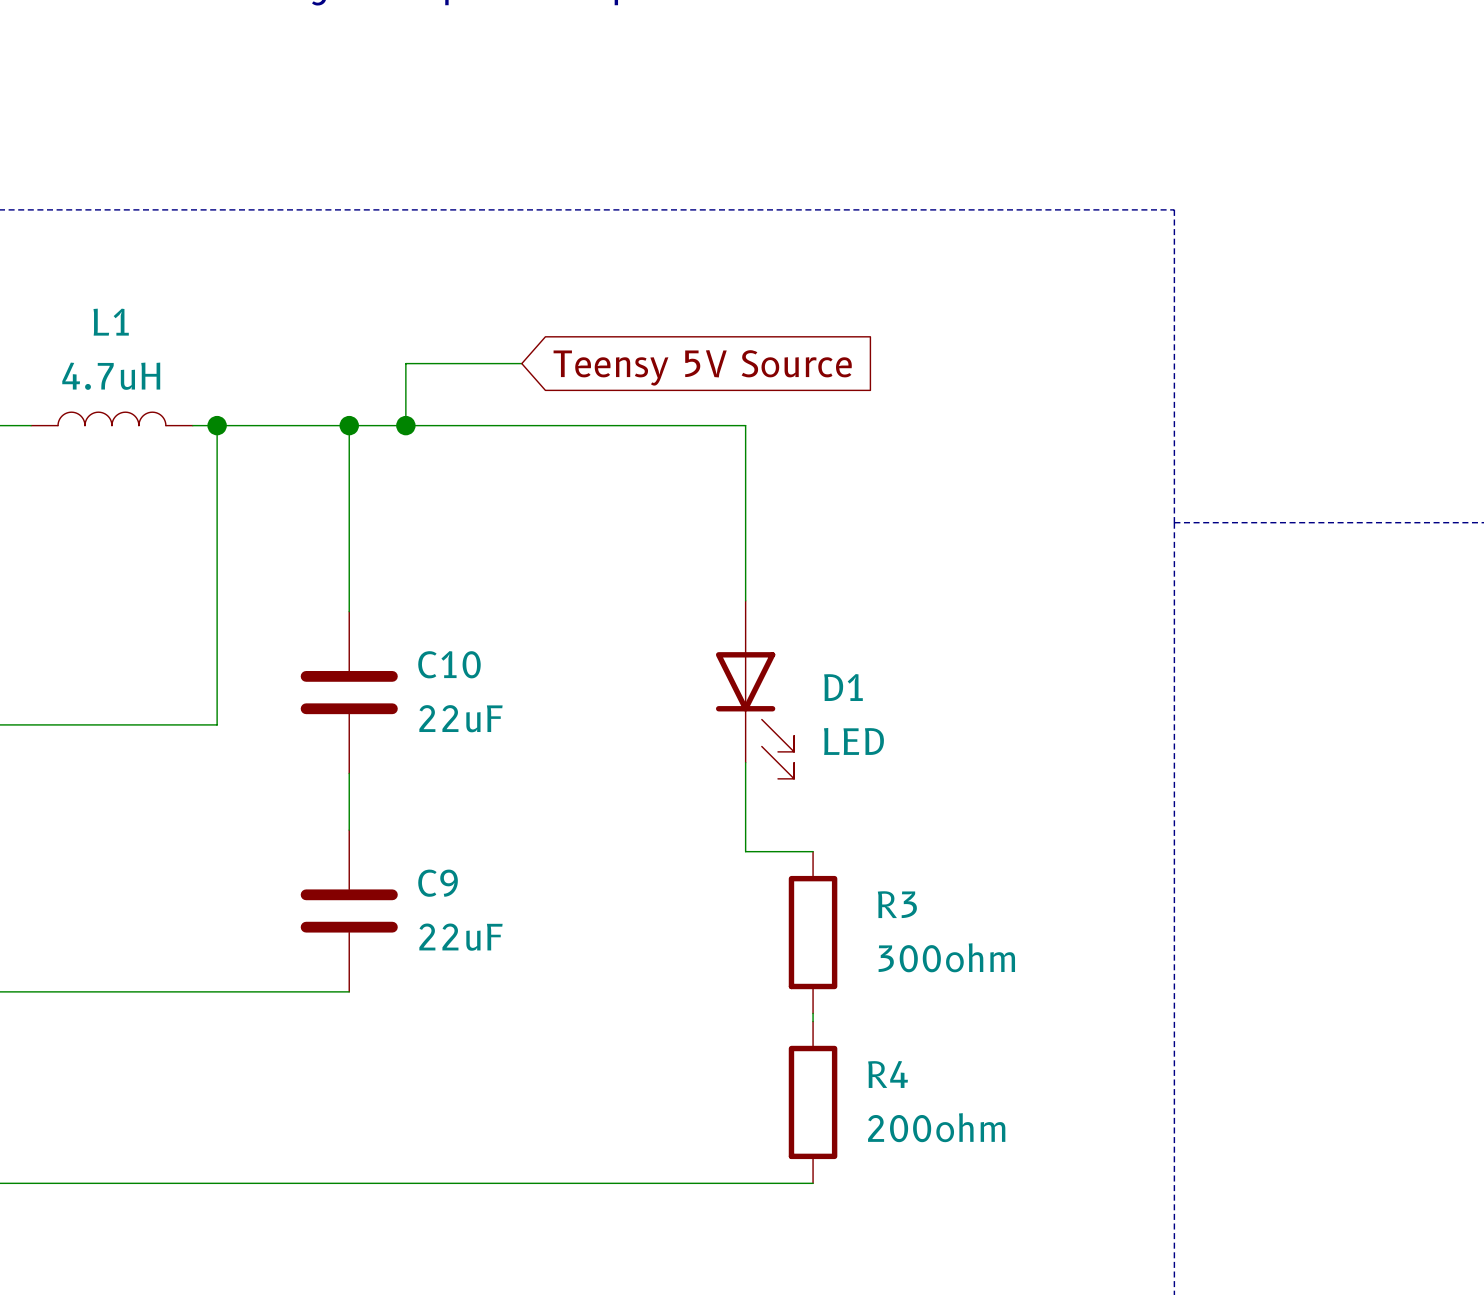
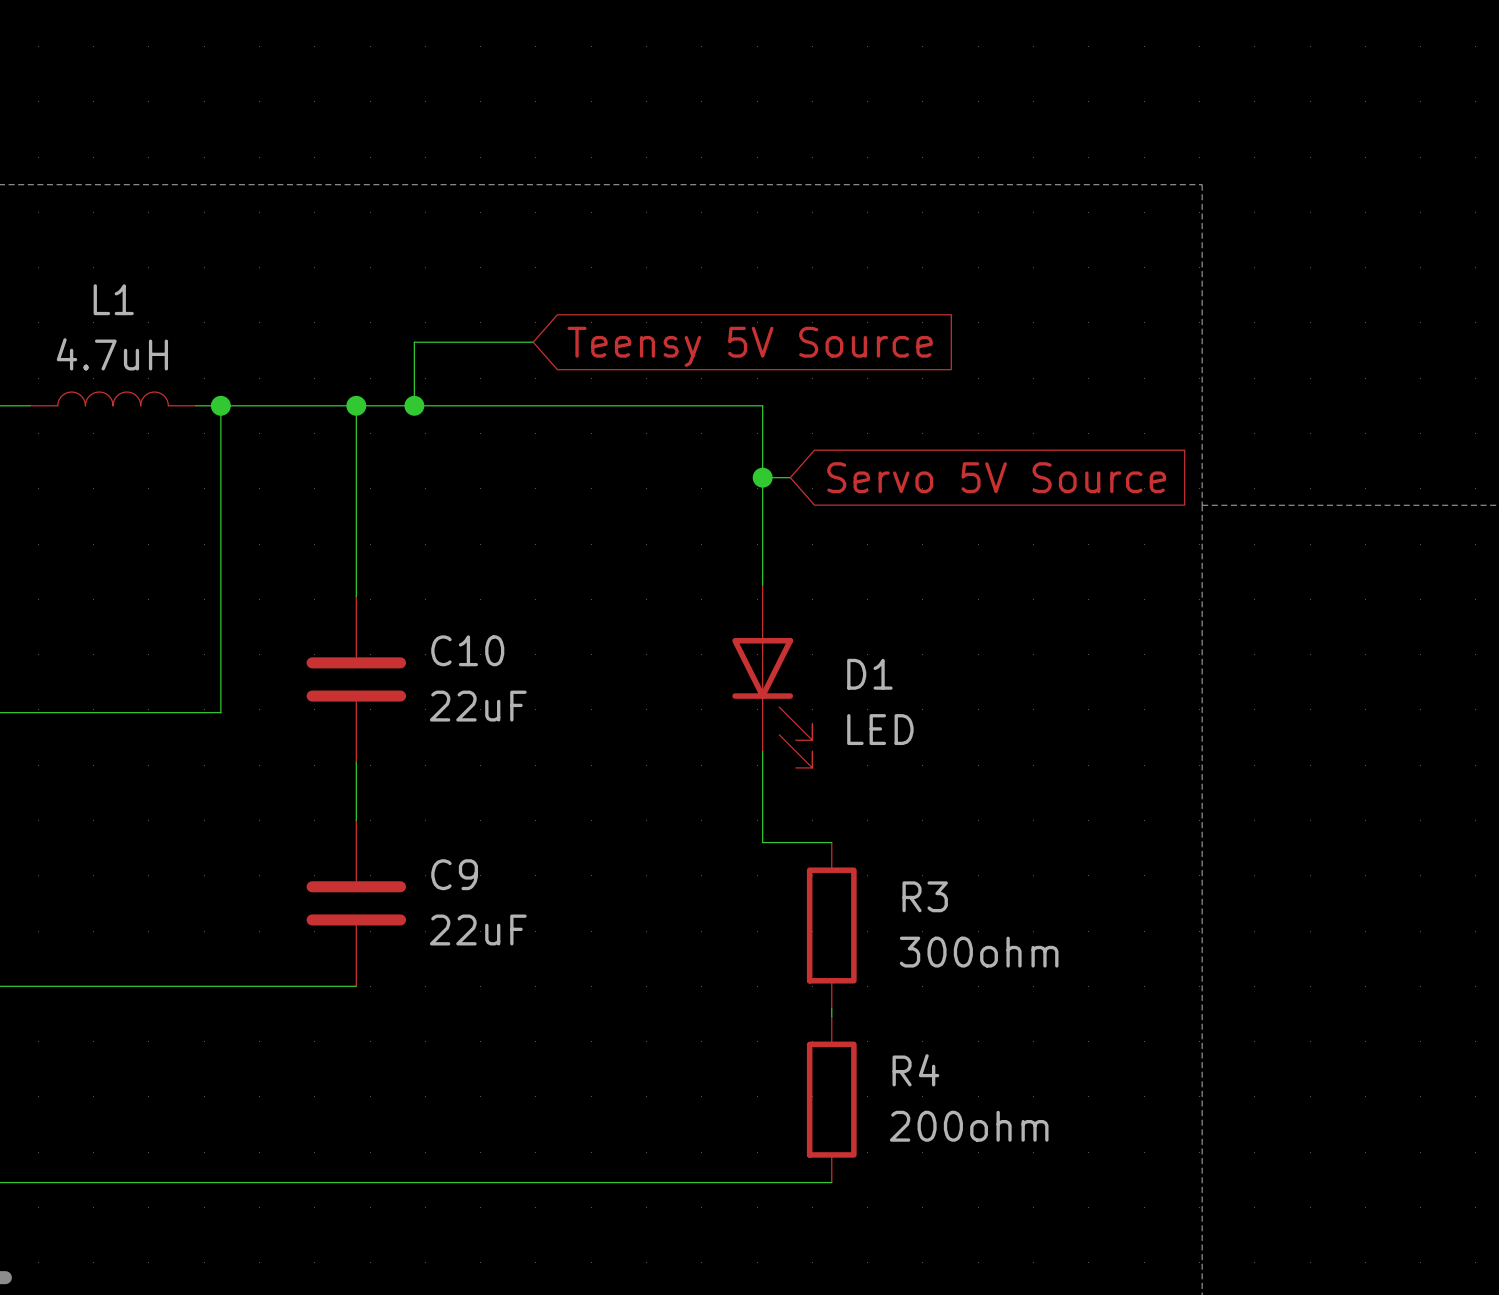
wire: none -> (762, 477) (790, 477)
junction: none -> (762, 477)
global label: none -> Servo 5V Source (996, 477)

